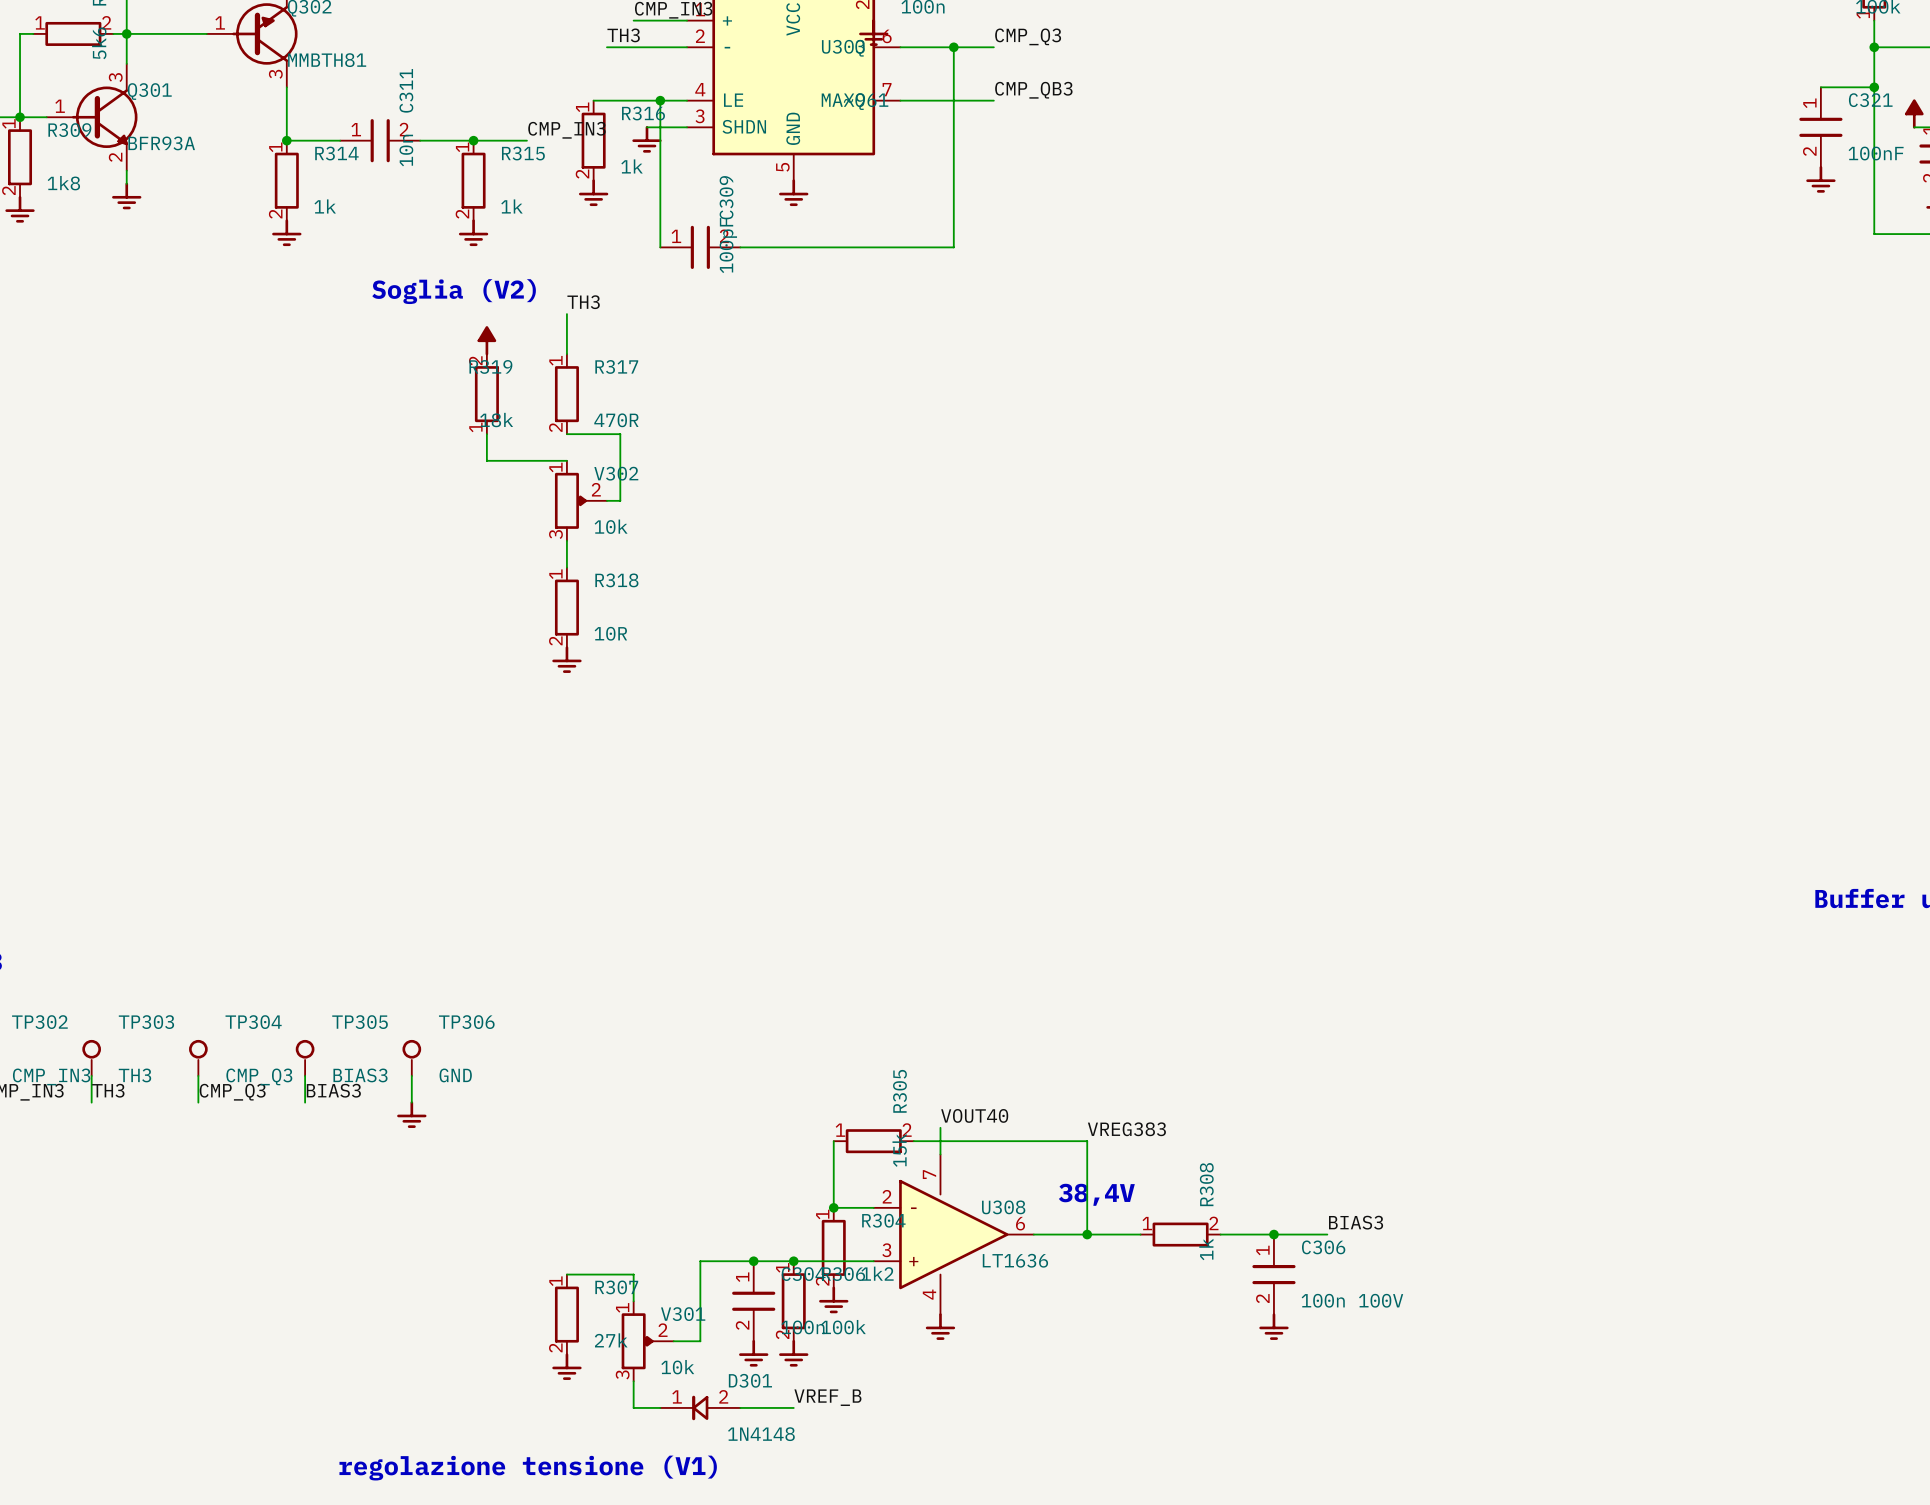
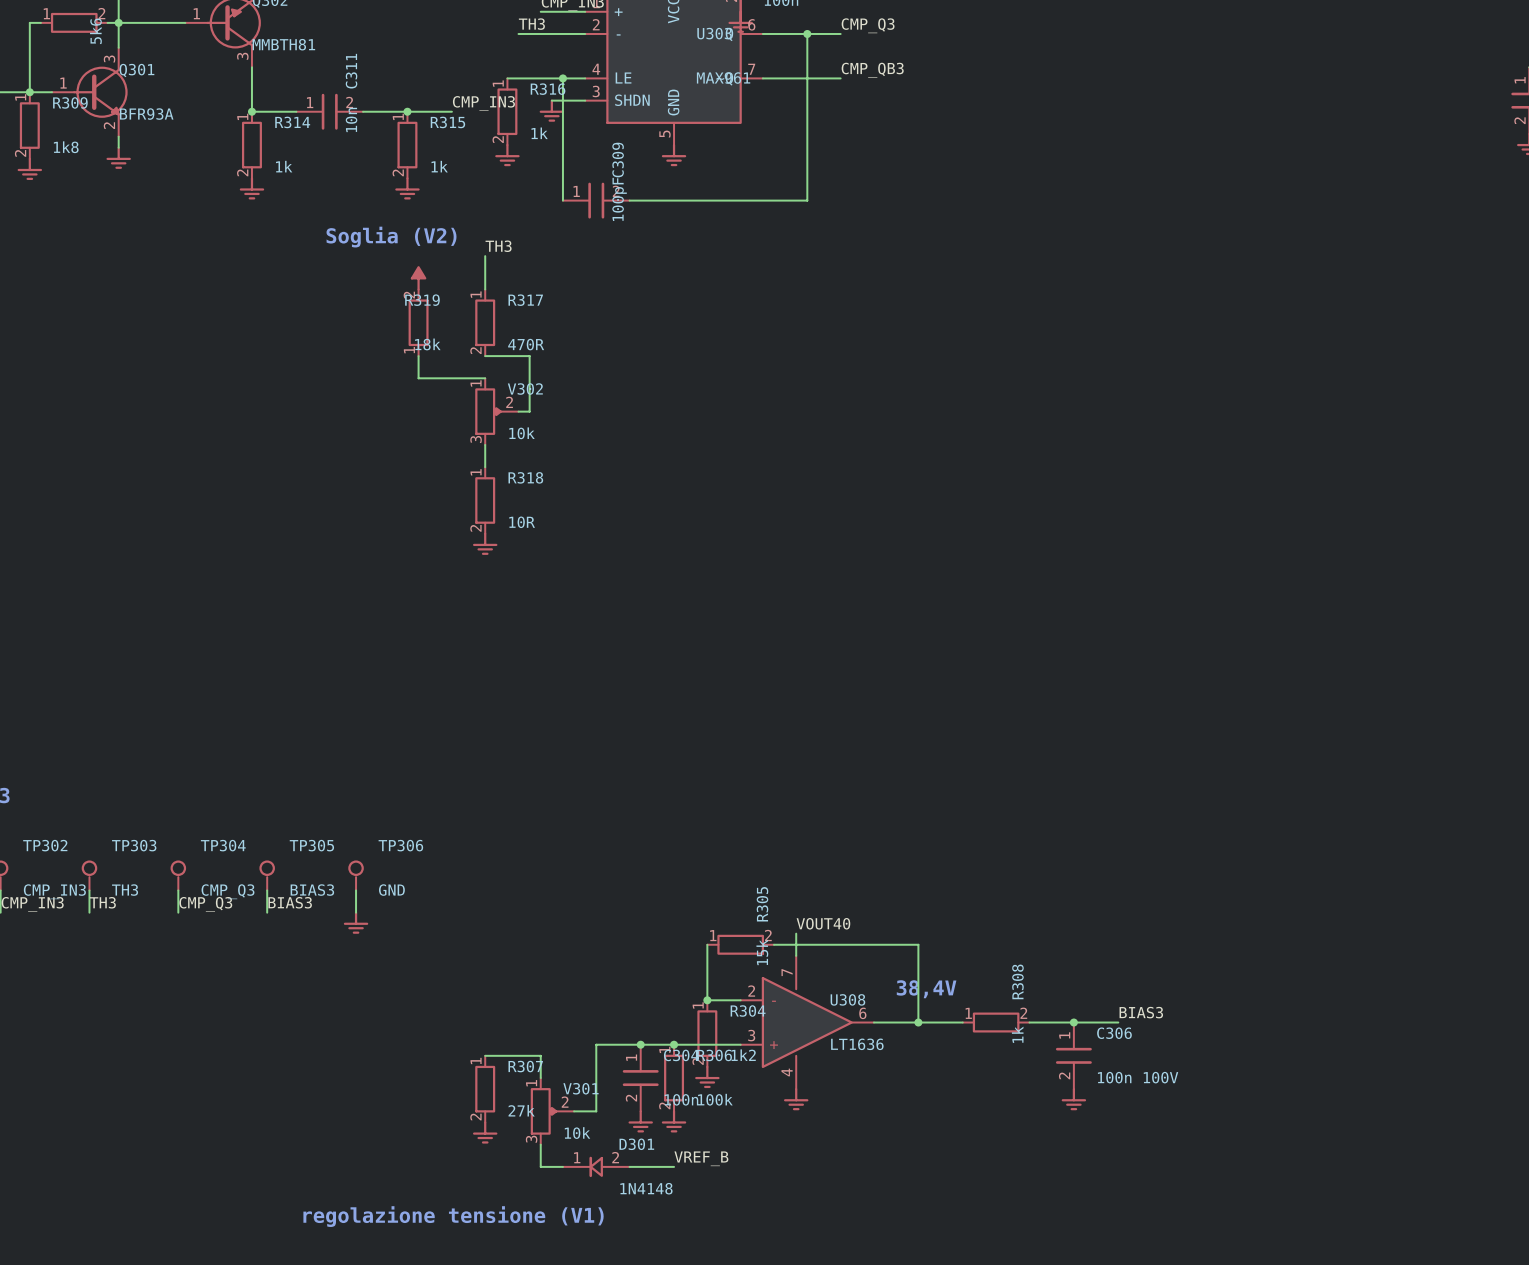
label: VREG383 (1126, 1129) -> none

